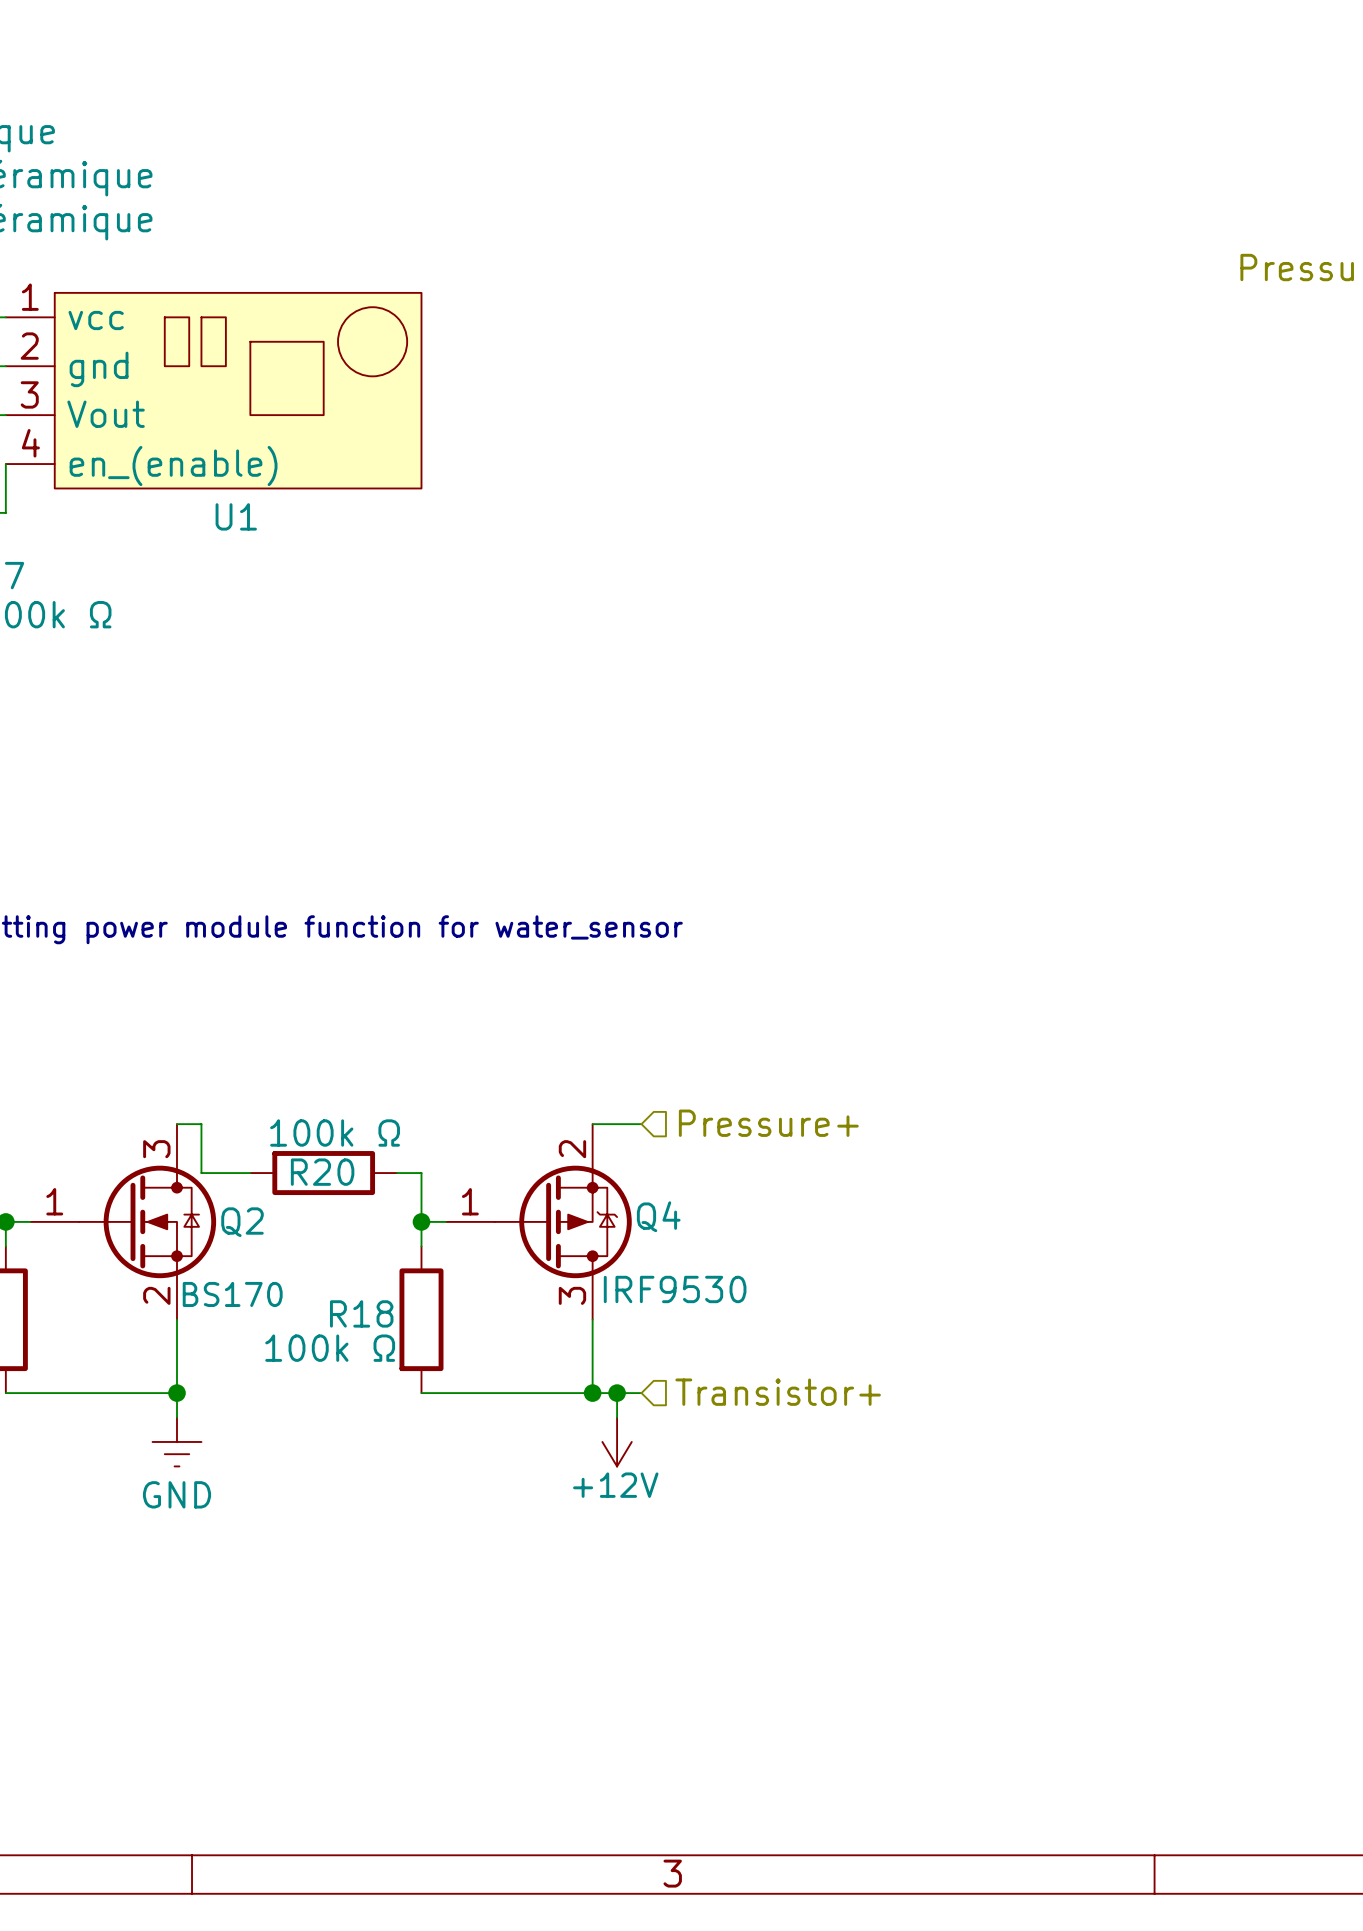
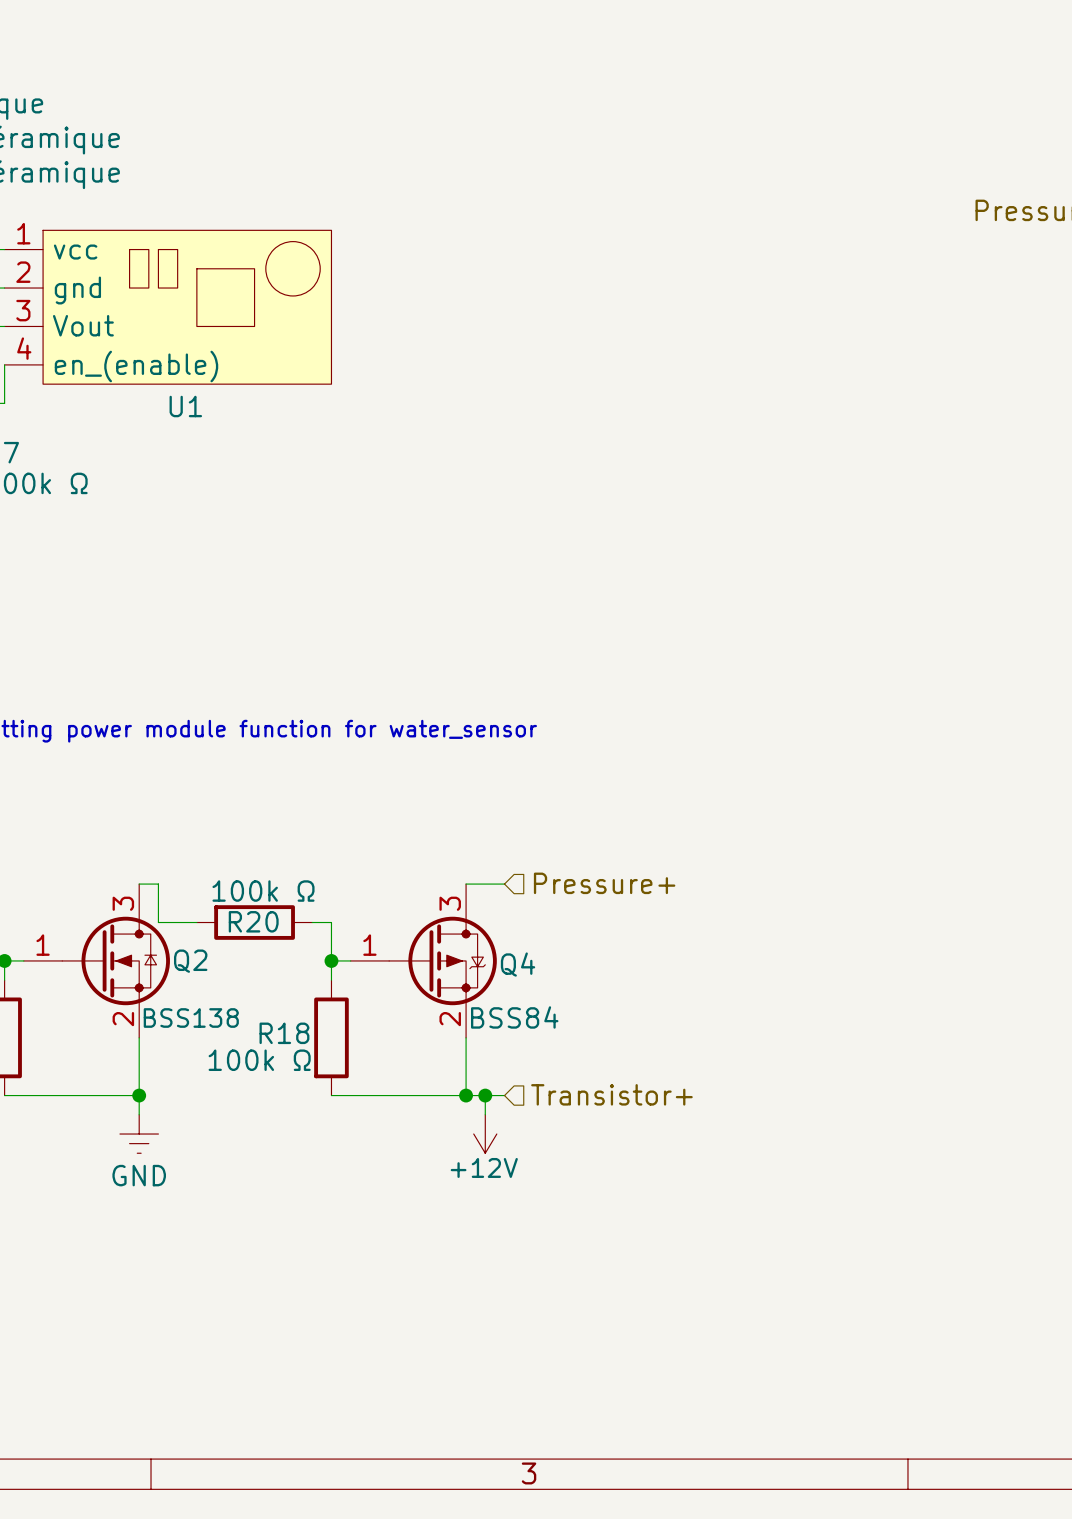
Q4 flip: as is (563, 1221) -> up-down (442, 960)
Q4 value: IRF9530 (675, 1289) -> BSS84 (514, 1017)
Q2 value: BS170 (232, 1294) -> BSS138 (191, 1018)

